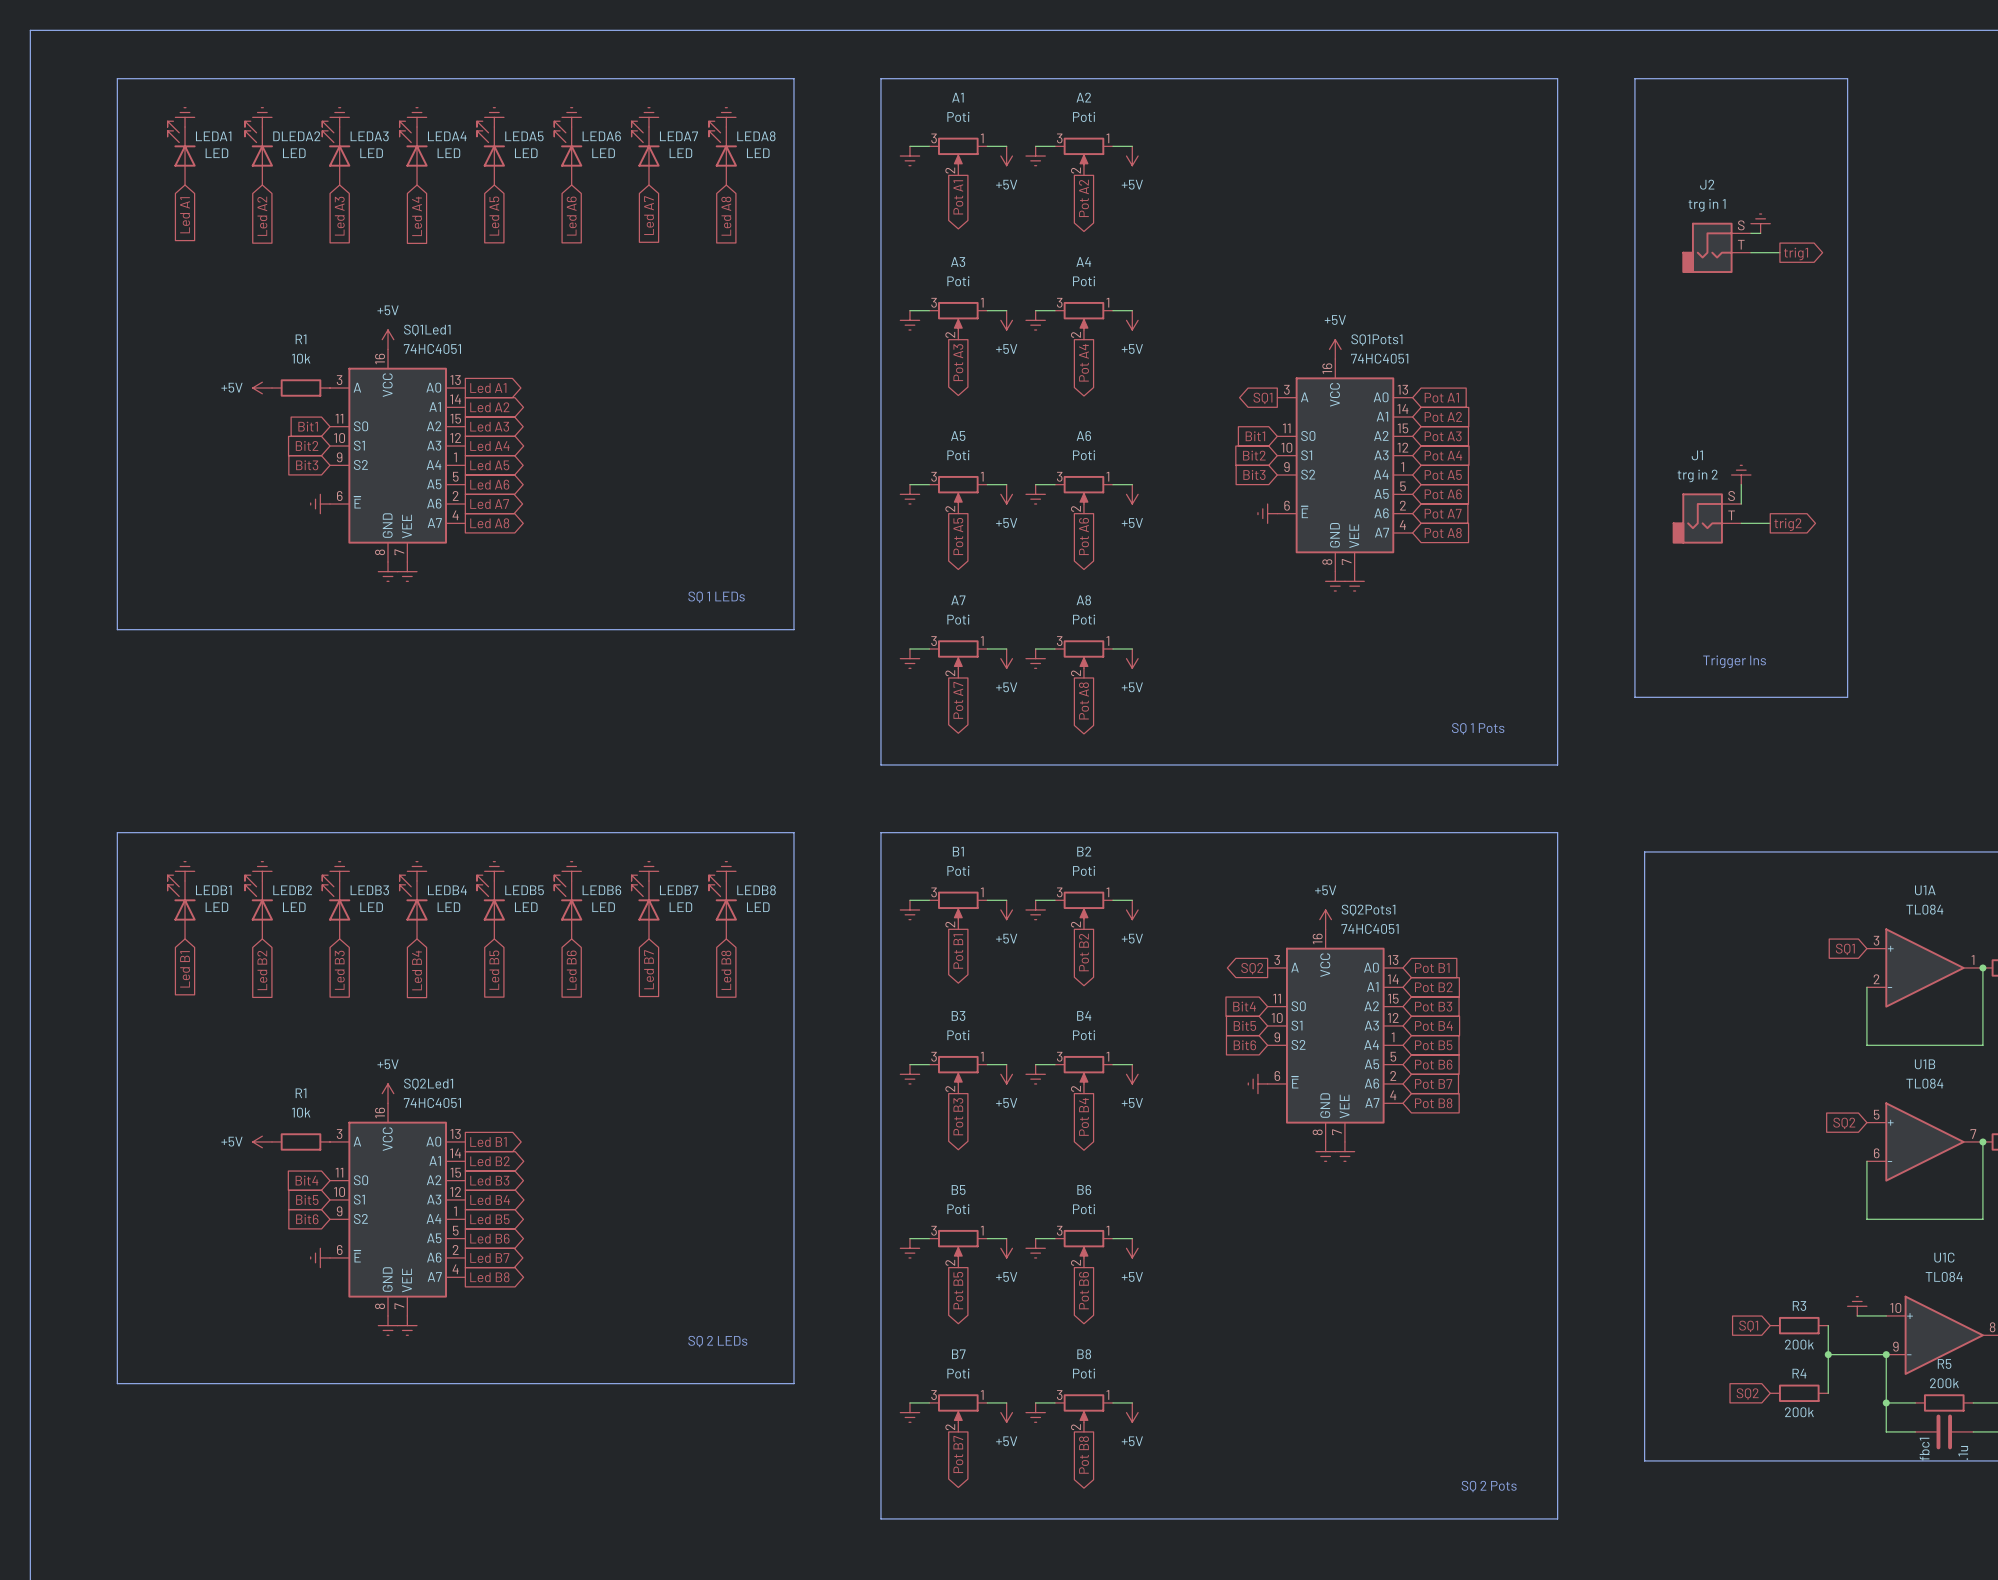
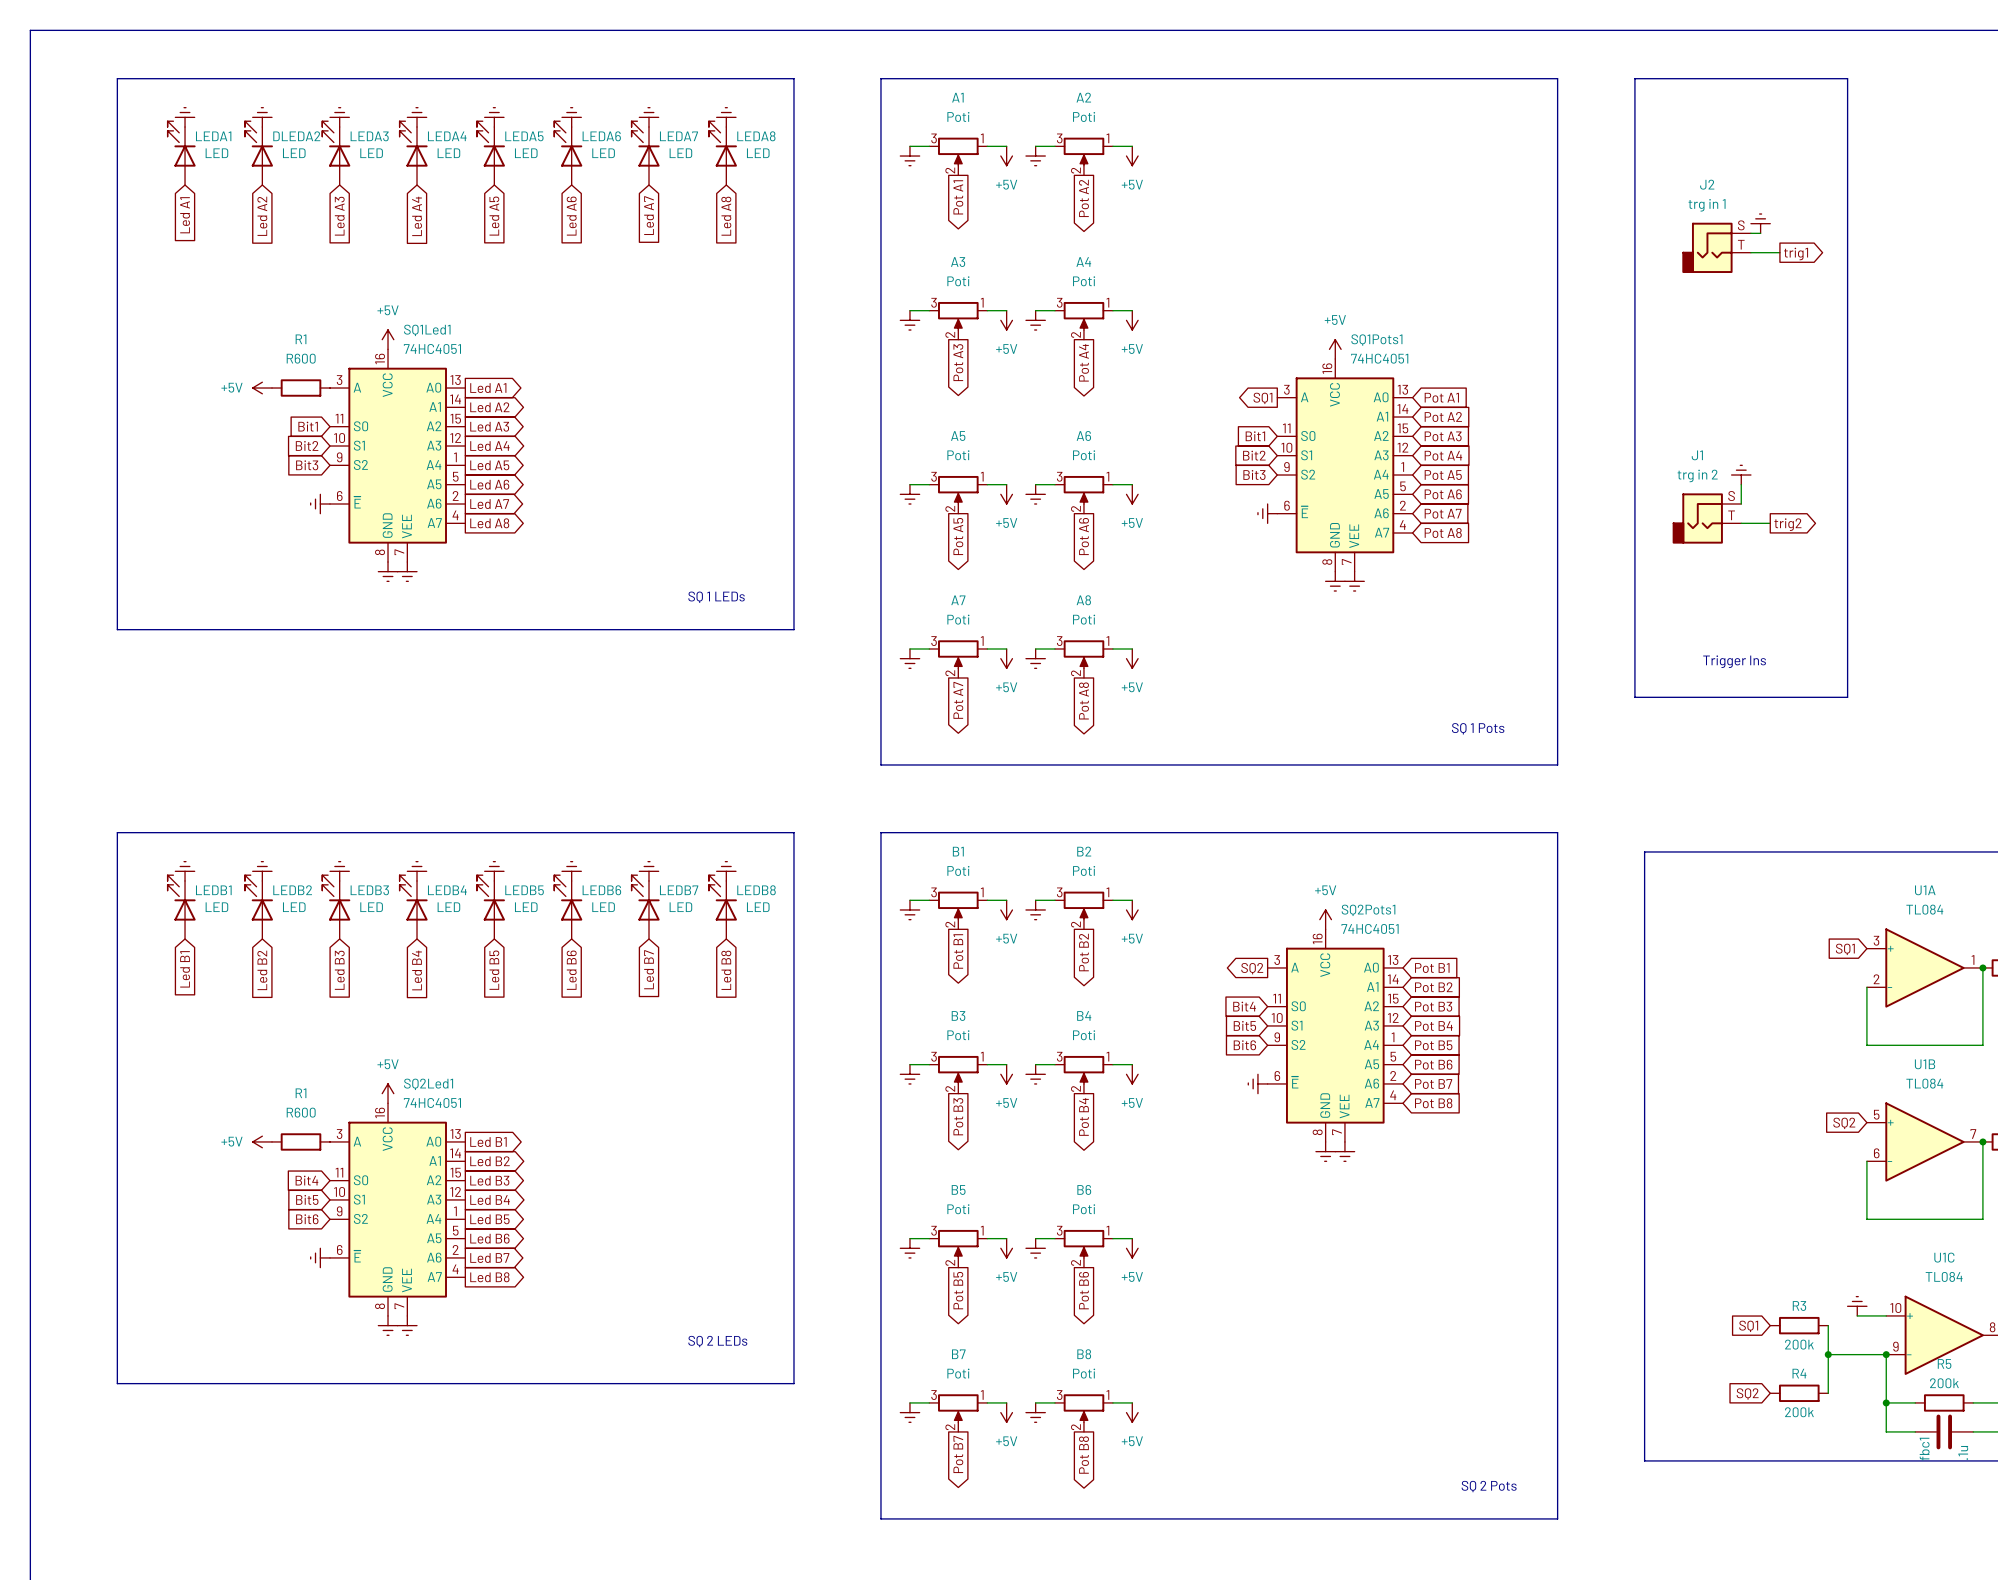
R1 value: 10k (301, 358) -> R600 (301, 358)
R1 value: 10k (301, 1112) -> R600 (301, 1112)

